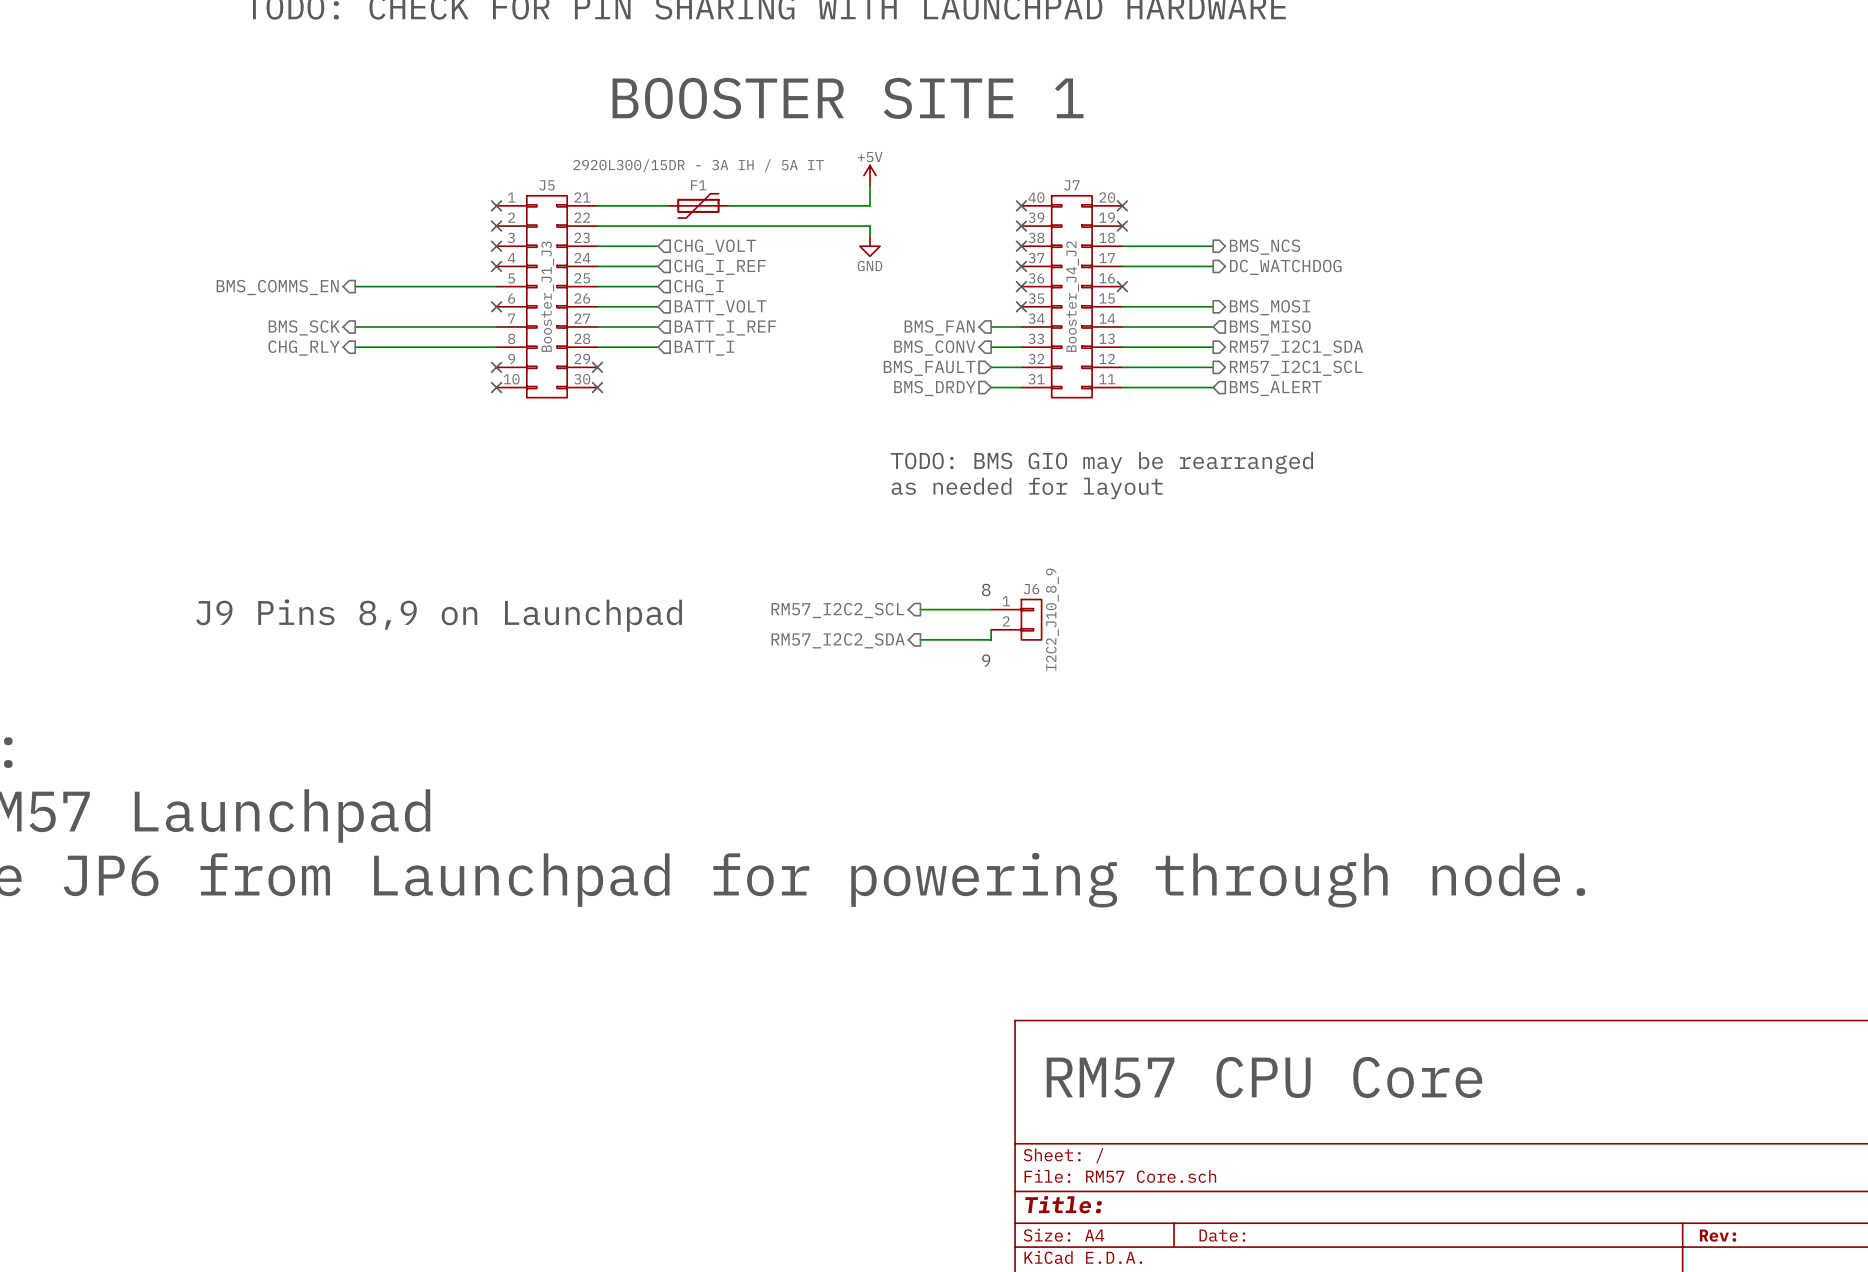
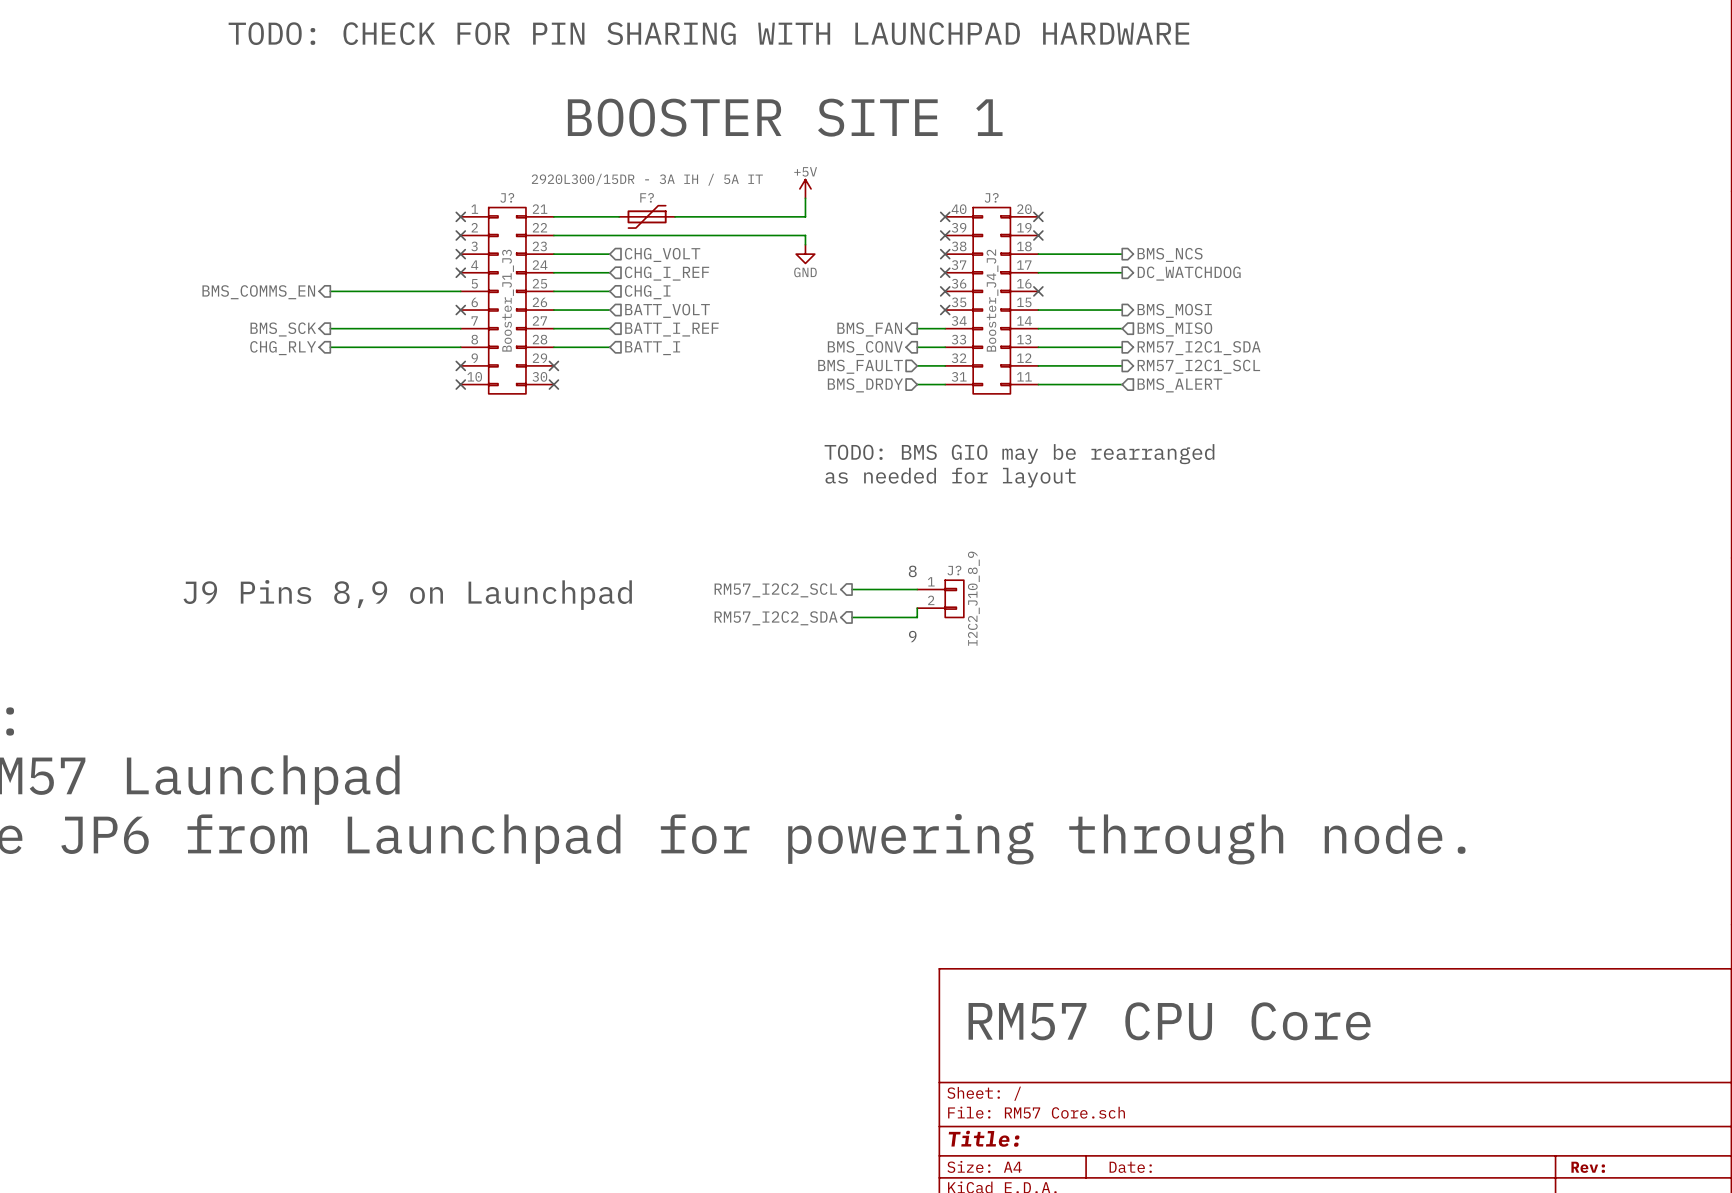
J5 name: J5 (547, 185) -> J? (507, 197)
F1 name: F1 (698, 185) -> F? (647, 197)
J7 name: J7 (1071, 185) -> J? (991, 197)
J6 name: J6 (1031, 589) -> J? (954, 570)

